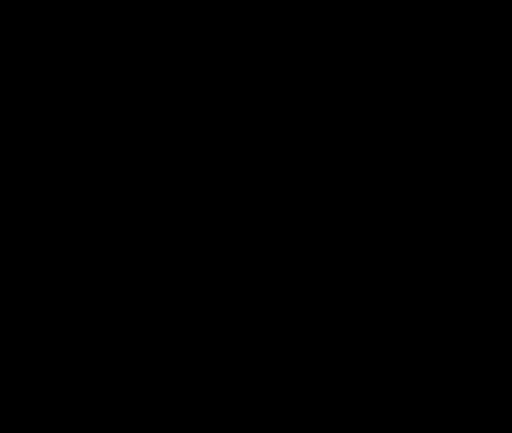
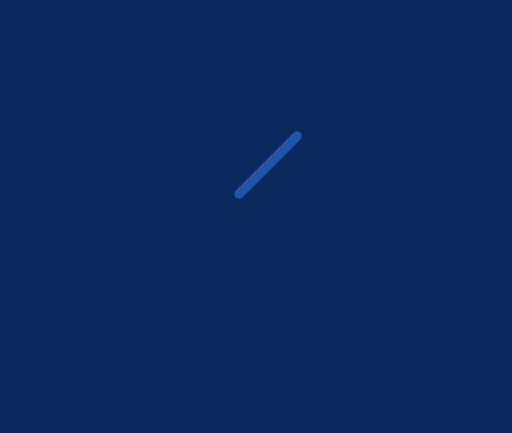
track: none -> (296, 136) (239, 193)

